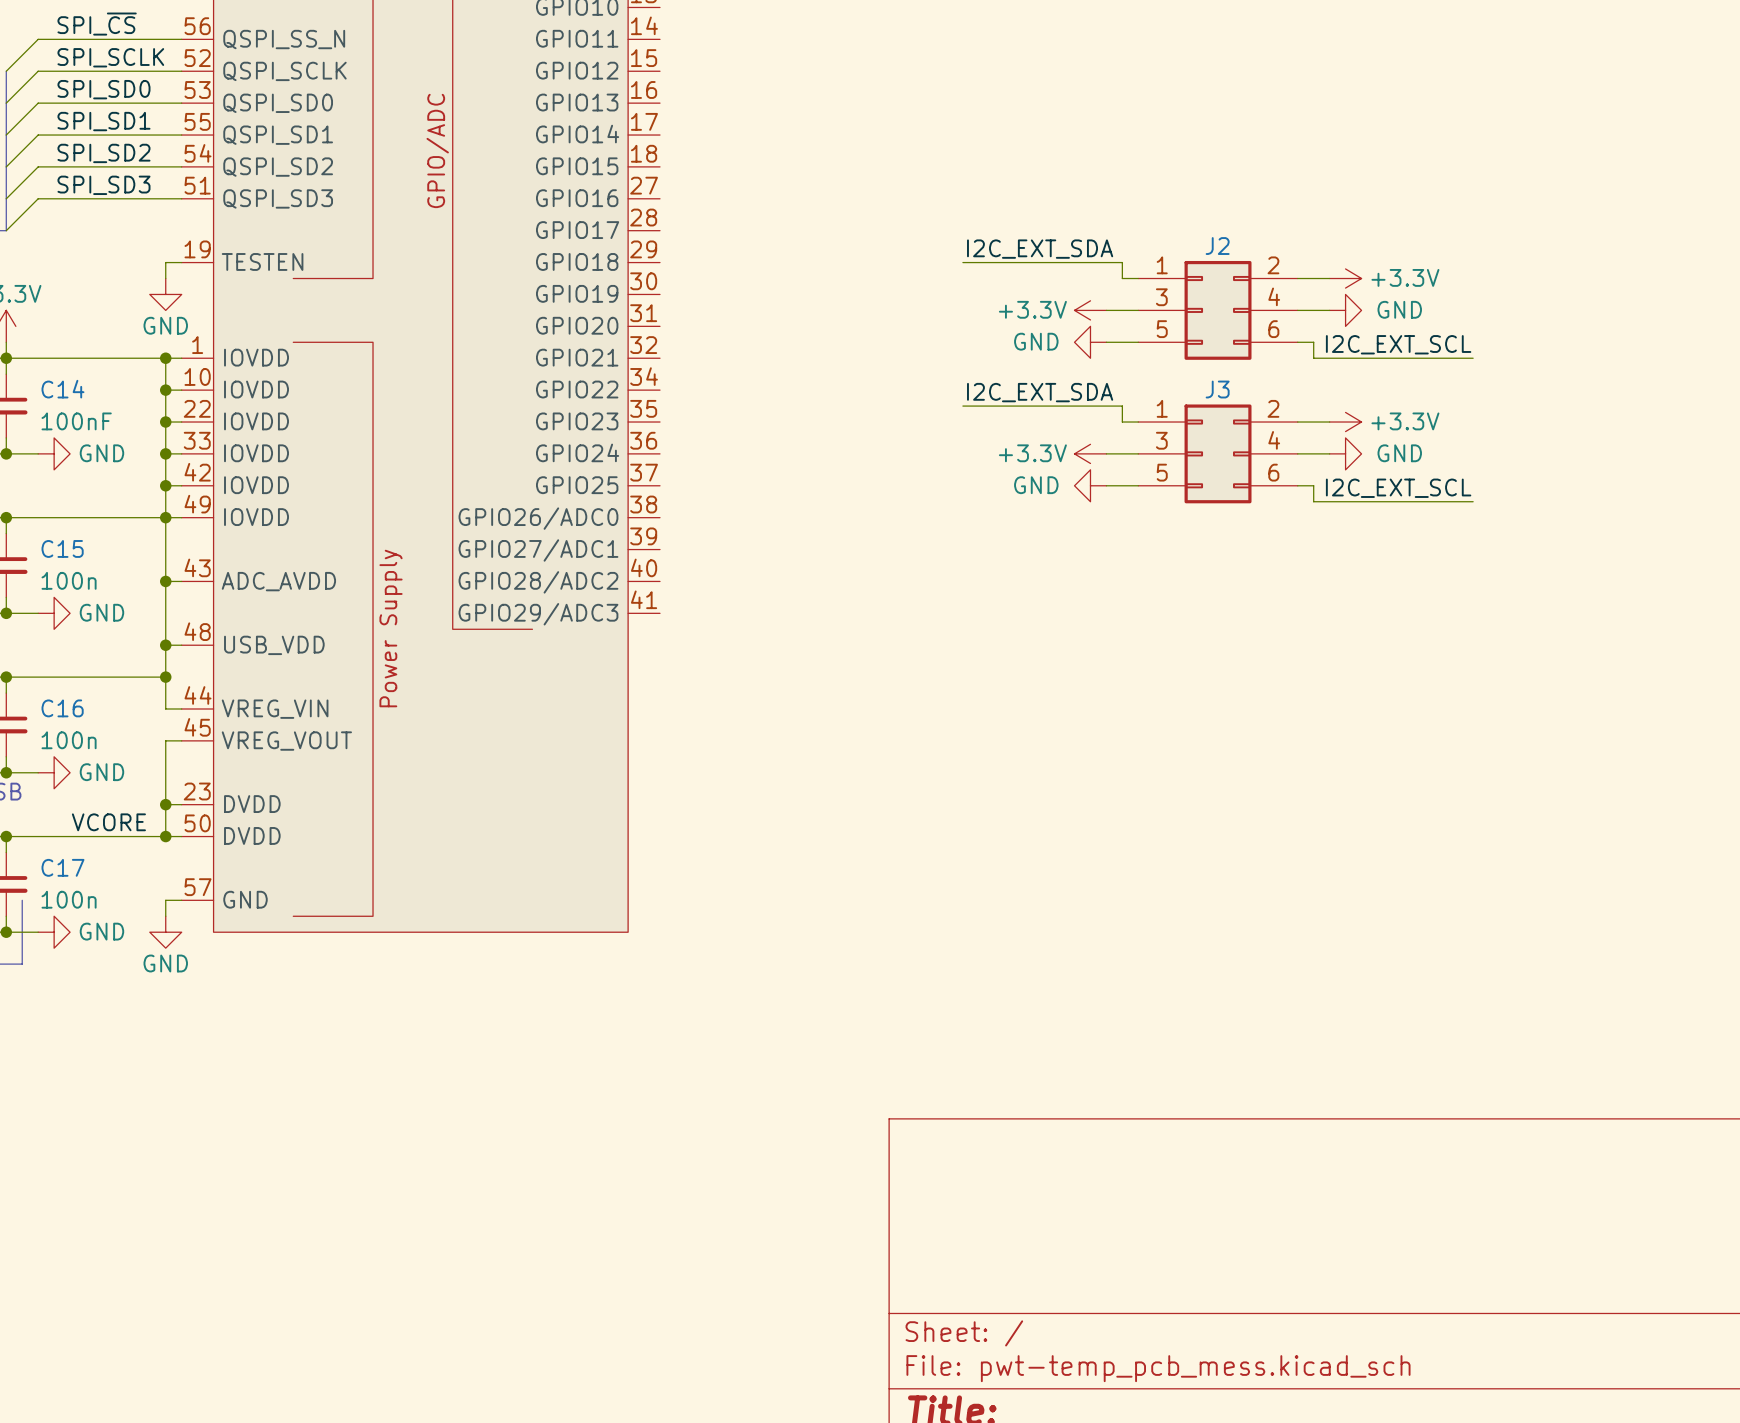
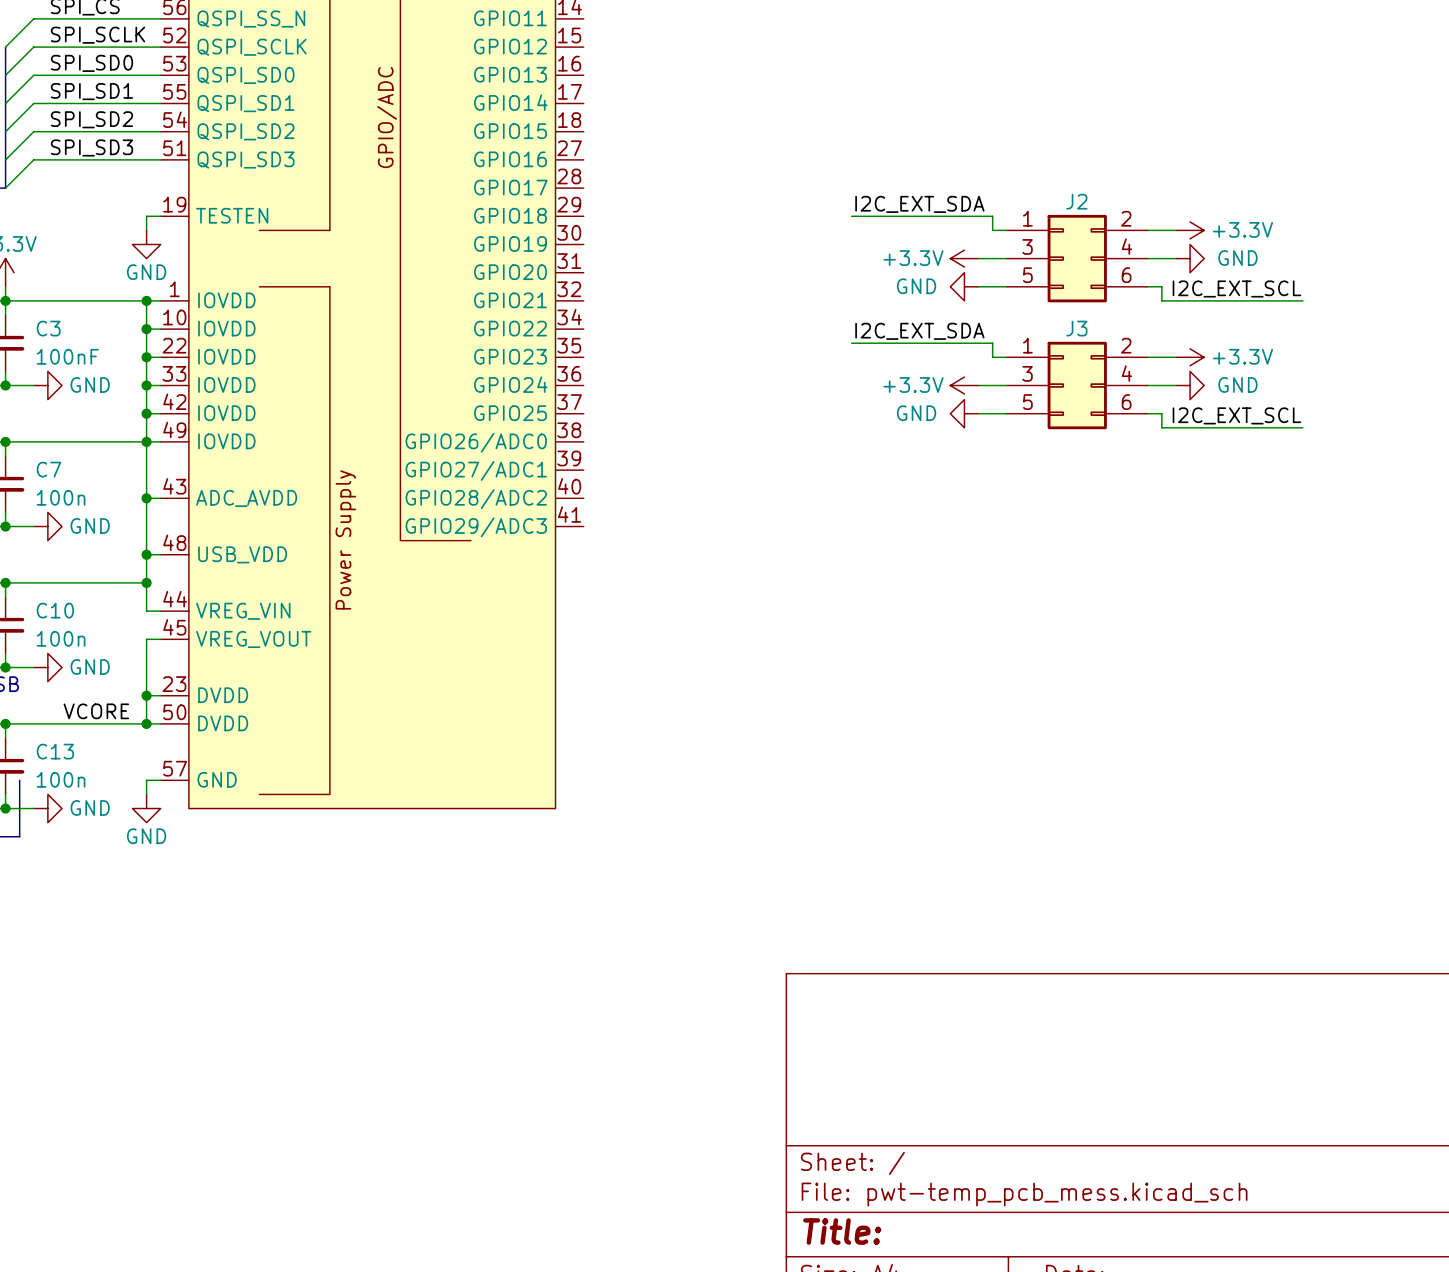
C14 name: C14 (62, 389) -> C3 (48, 328)
C15 name: C15 (62, 548) -> C7 (48, 469)
C16 name: C16 (62, 708) -> C10 (55, 610)
C17 name: C17 (62, 867) -> C13 (55, 751)

